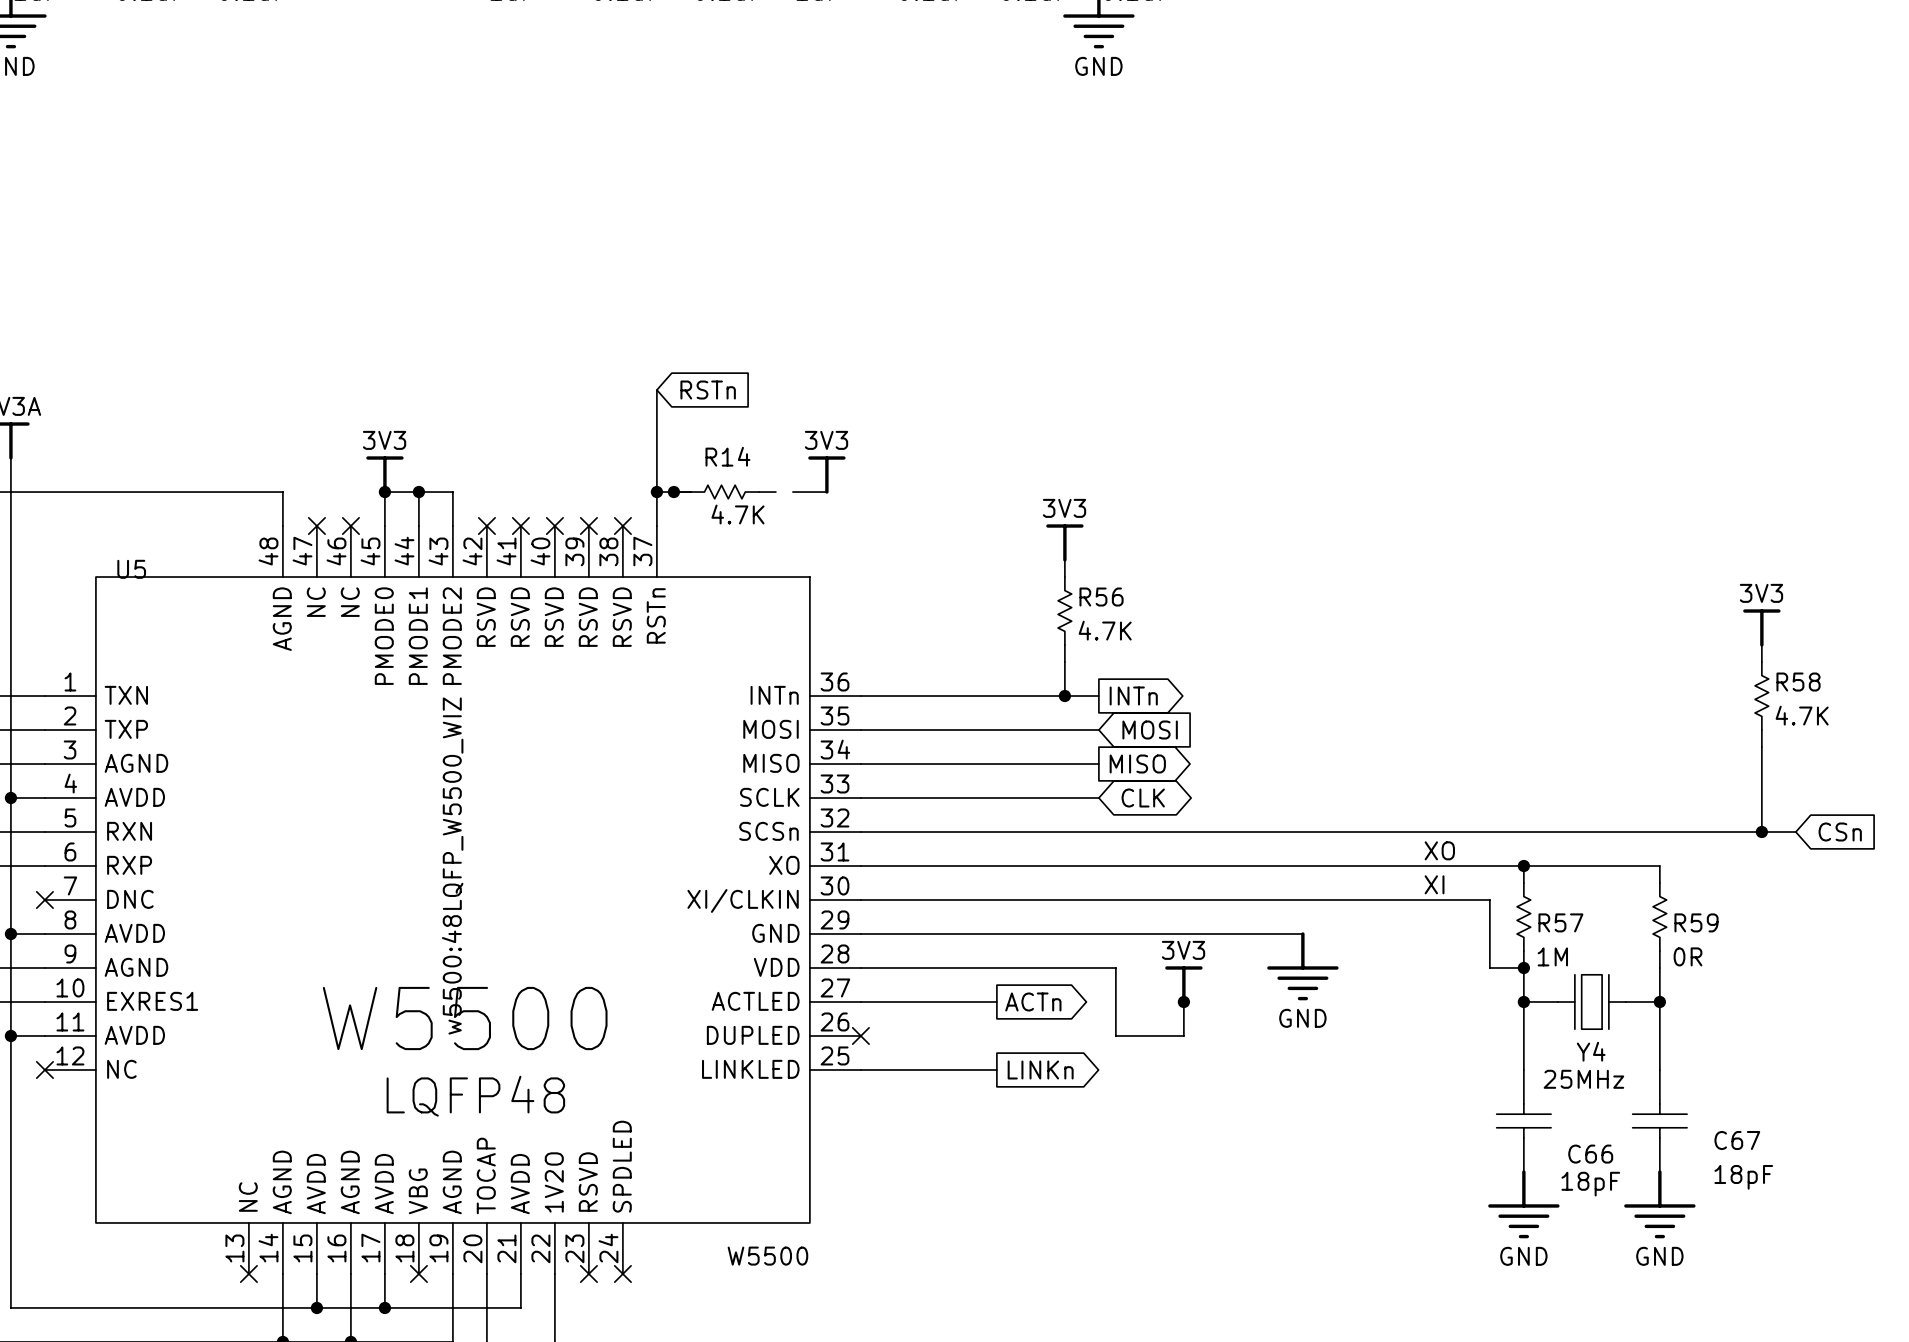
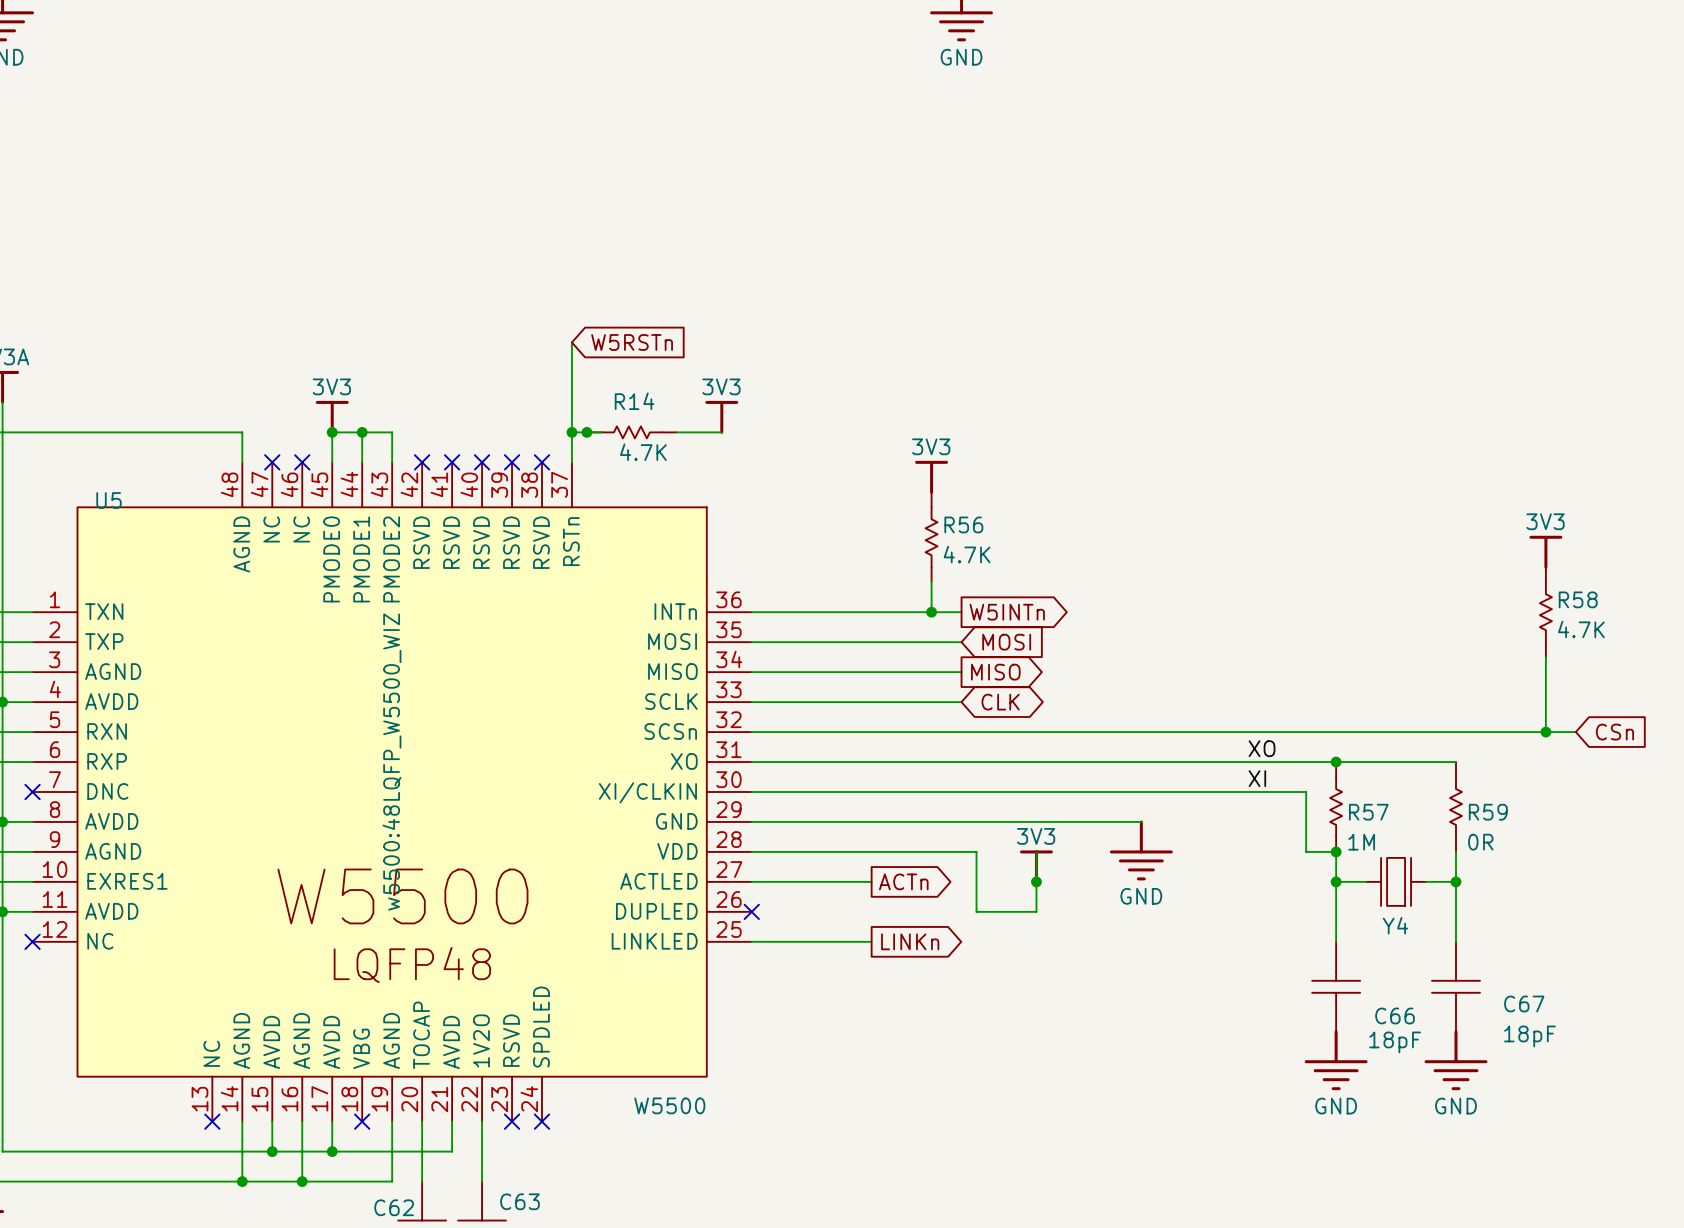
global label: RSTn (708, 390) -> W5RSTn (632, 342)
wire: none -> (676, 432) (691, 432)
global label: INTn (1133, 696) -> W5INTn (1007, 612)
Y4 value: 25MHz (1583, 1079) -> none

